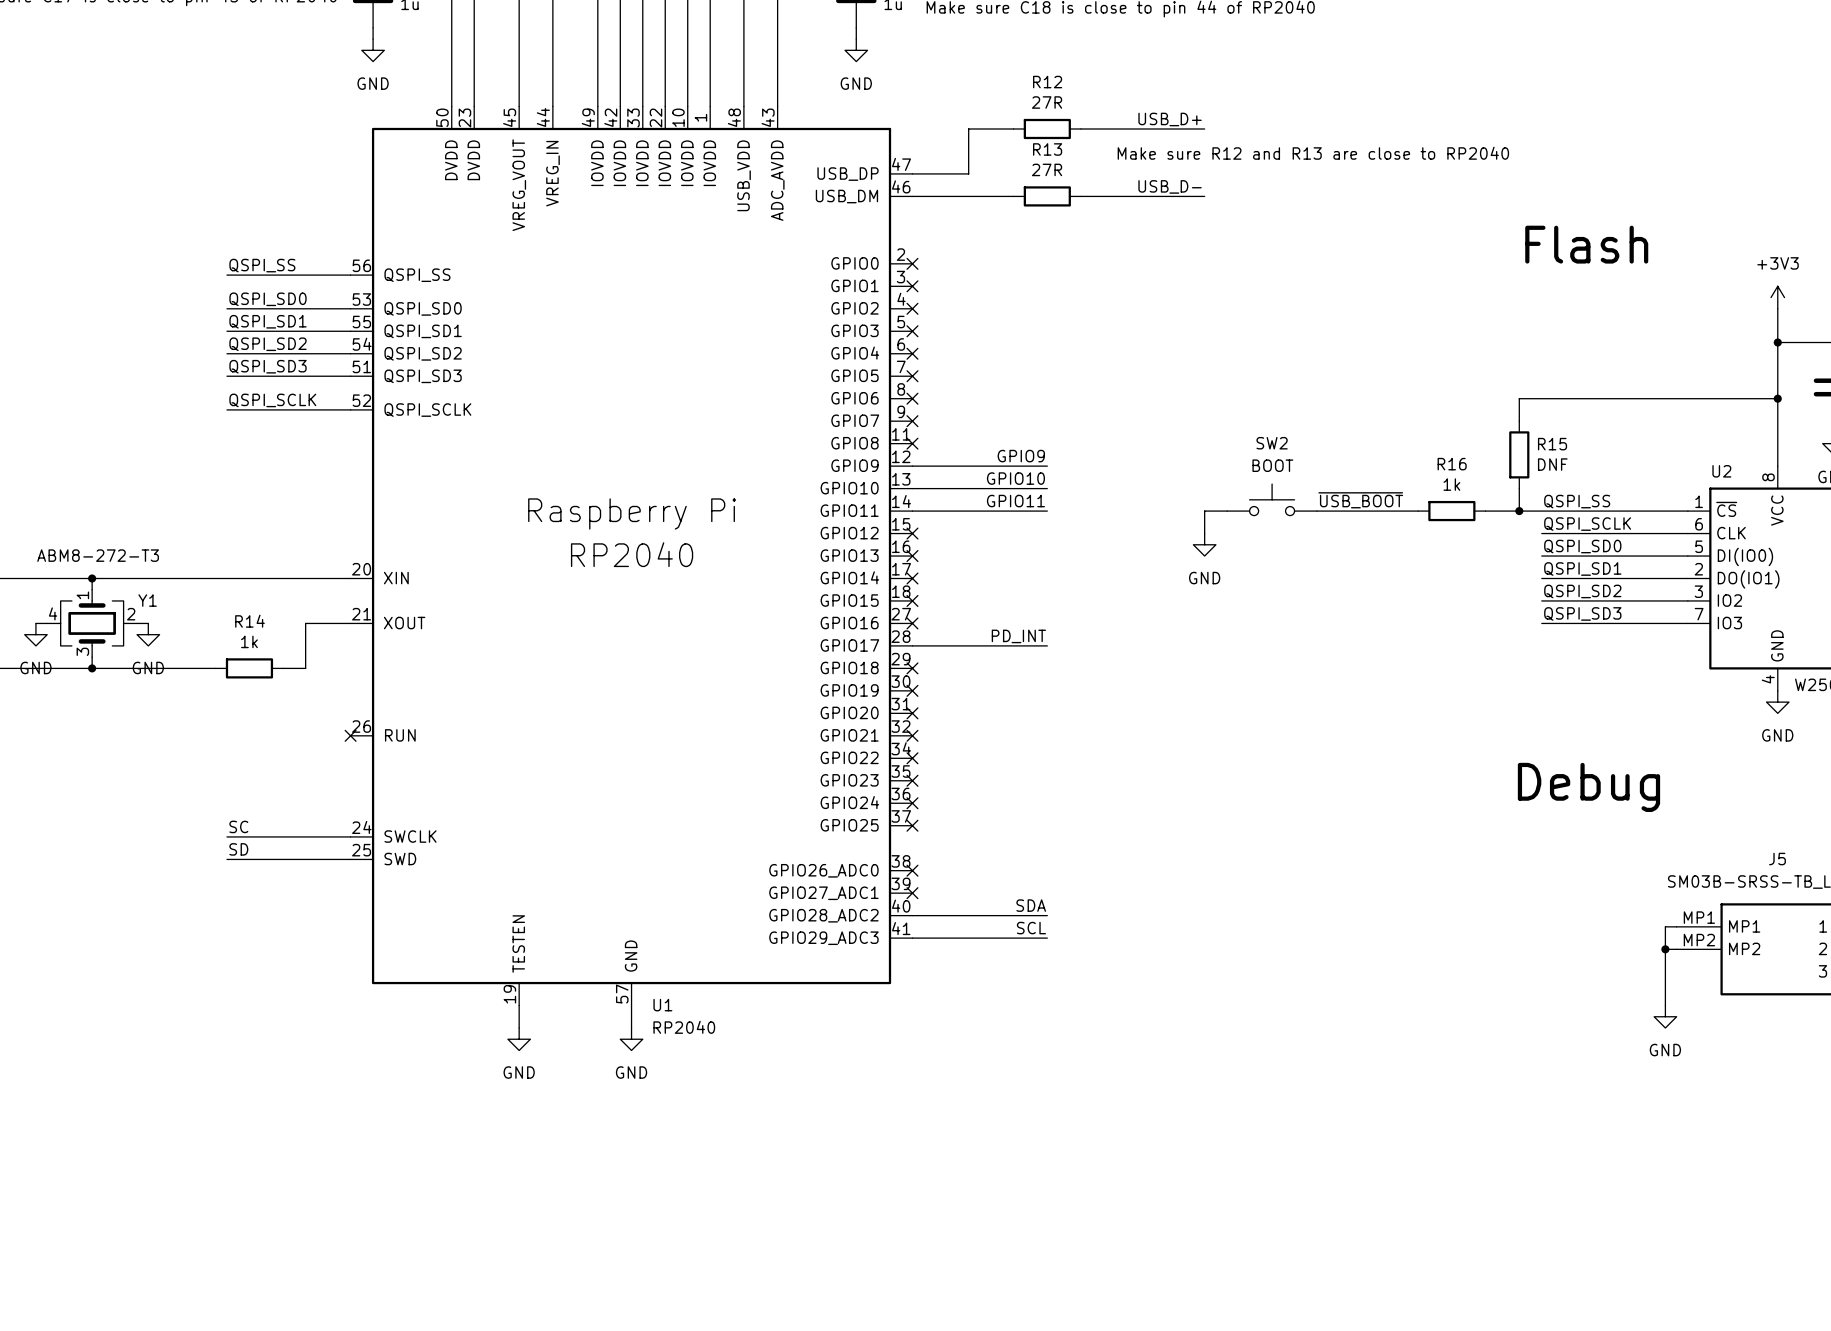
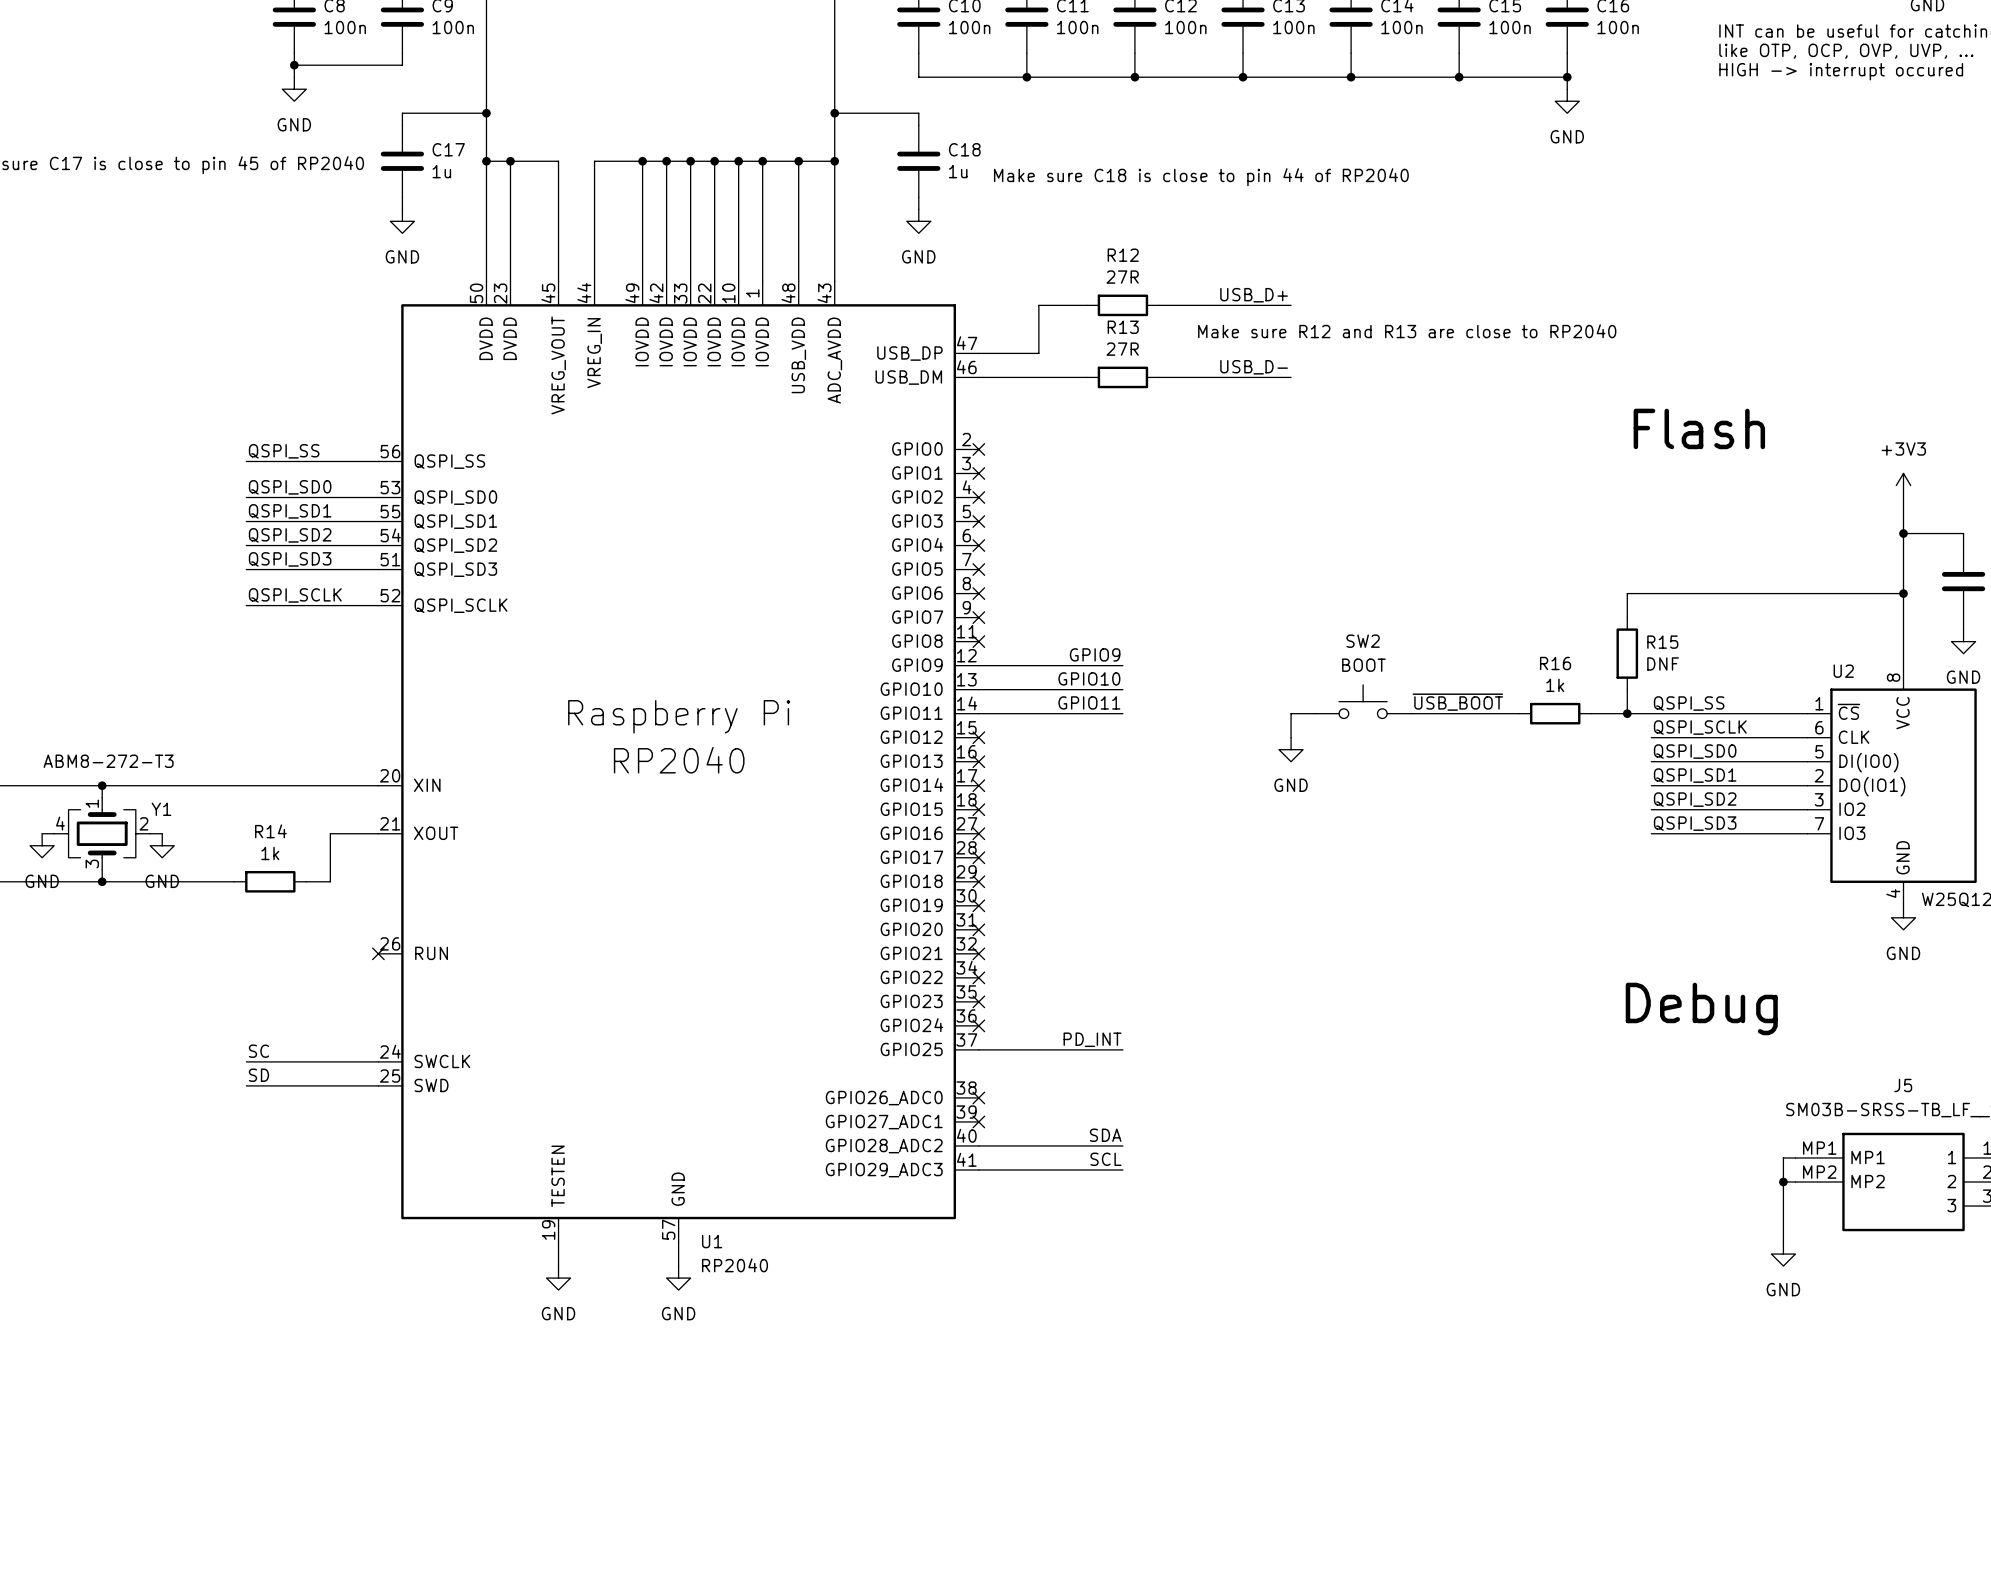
label position: PD_INT (1018, 636) -> PD_INT (1092, 1039)
wire: (912, 645) (1047, 645) -> (978, 1049) (1122, 1049)
no-connect mark: none -> (978, 857)
no-connect mark: (912, 825) -> none

